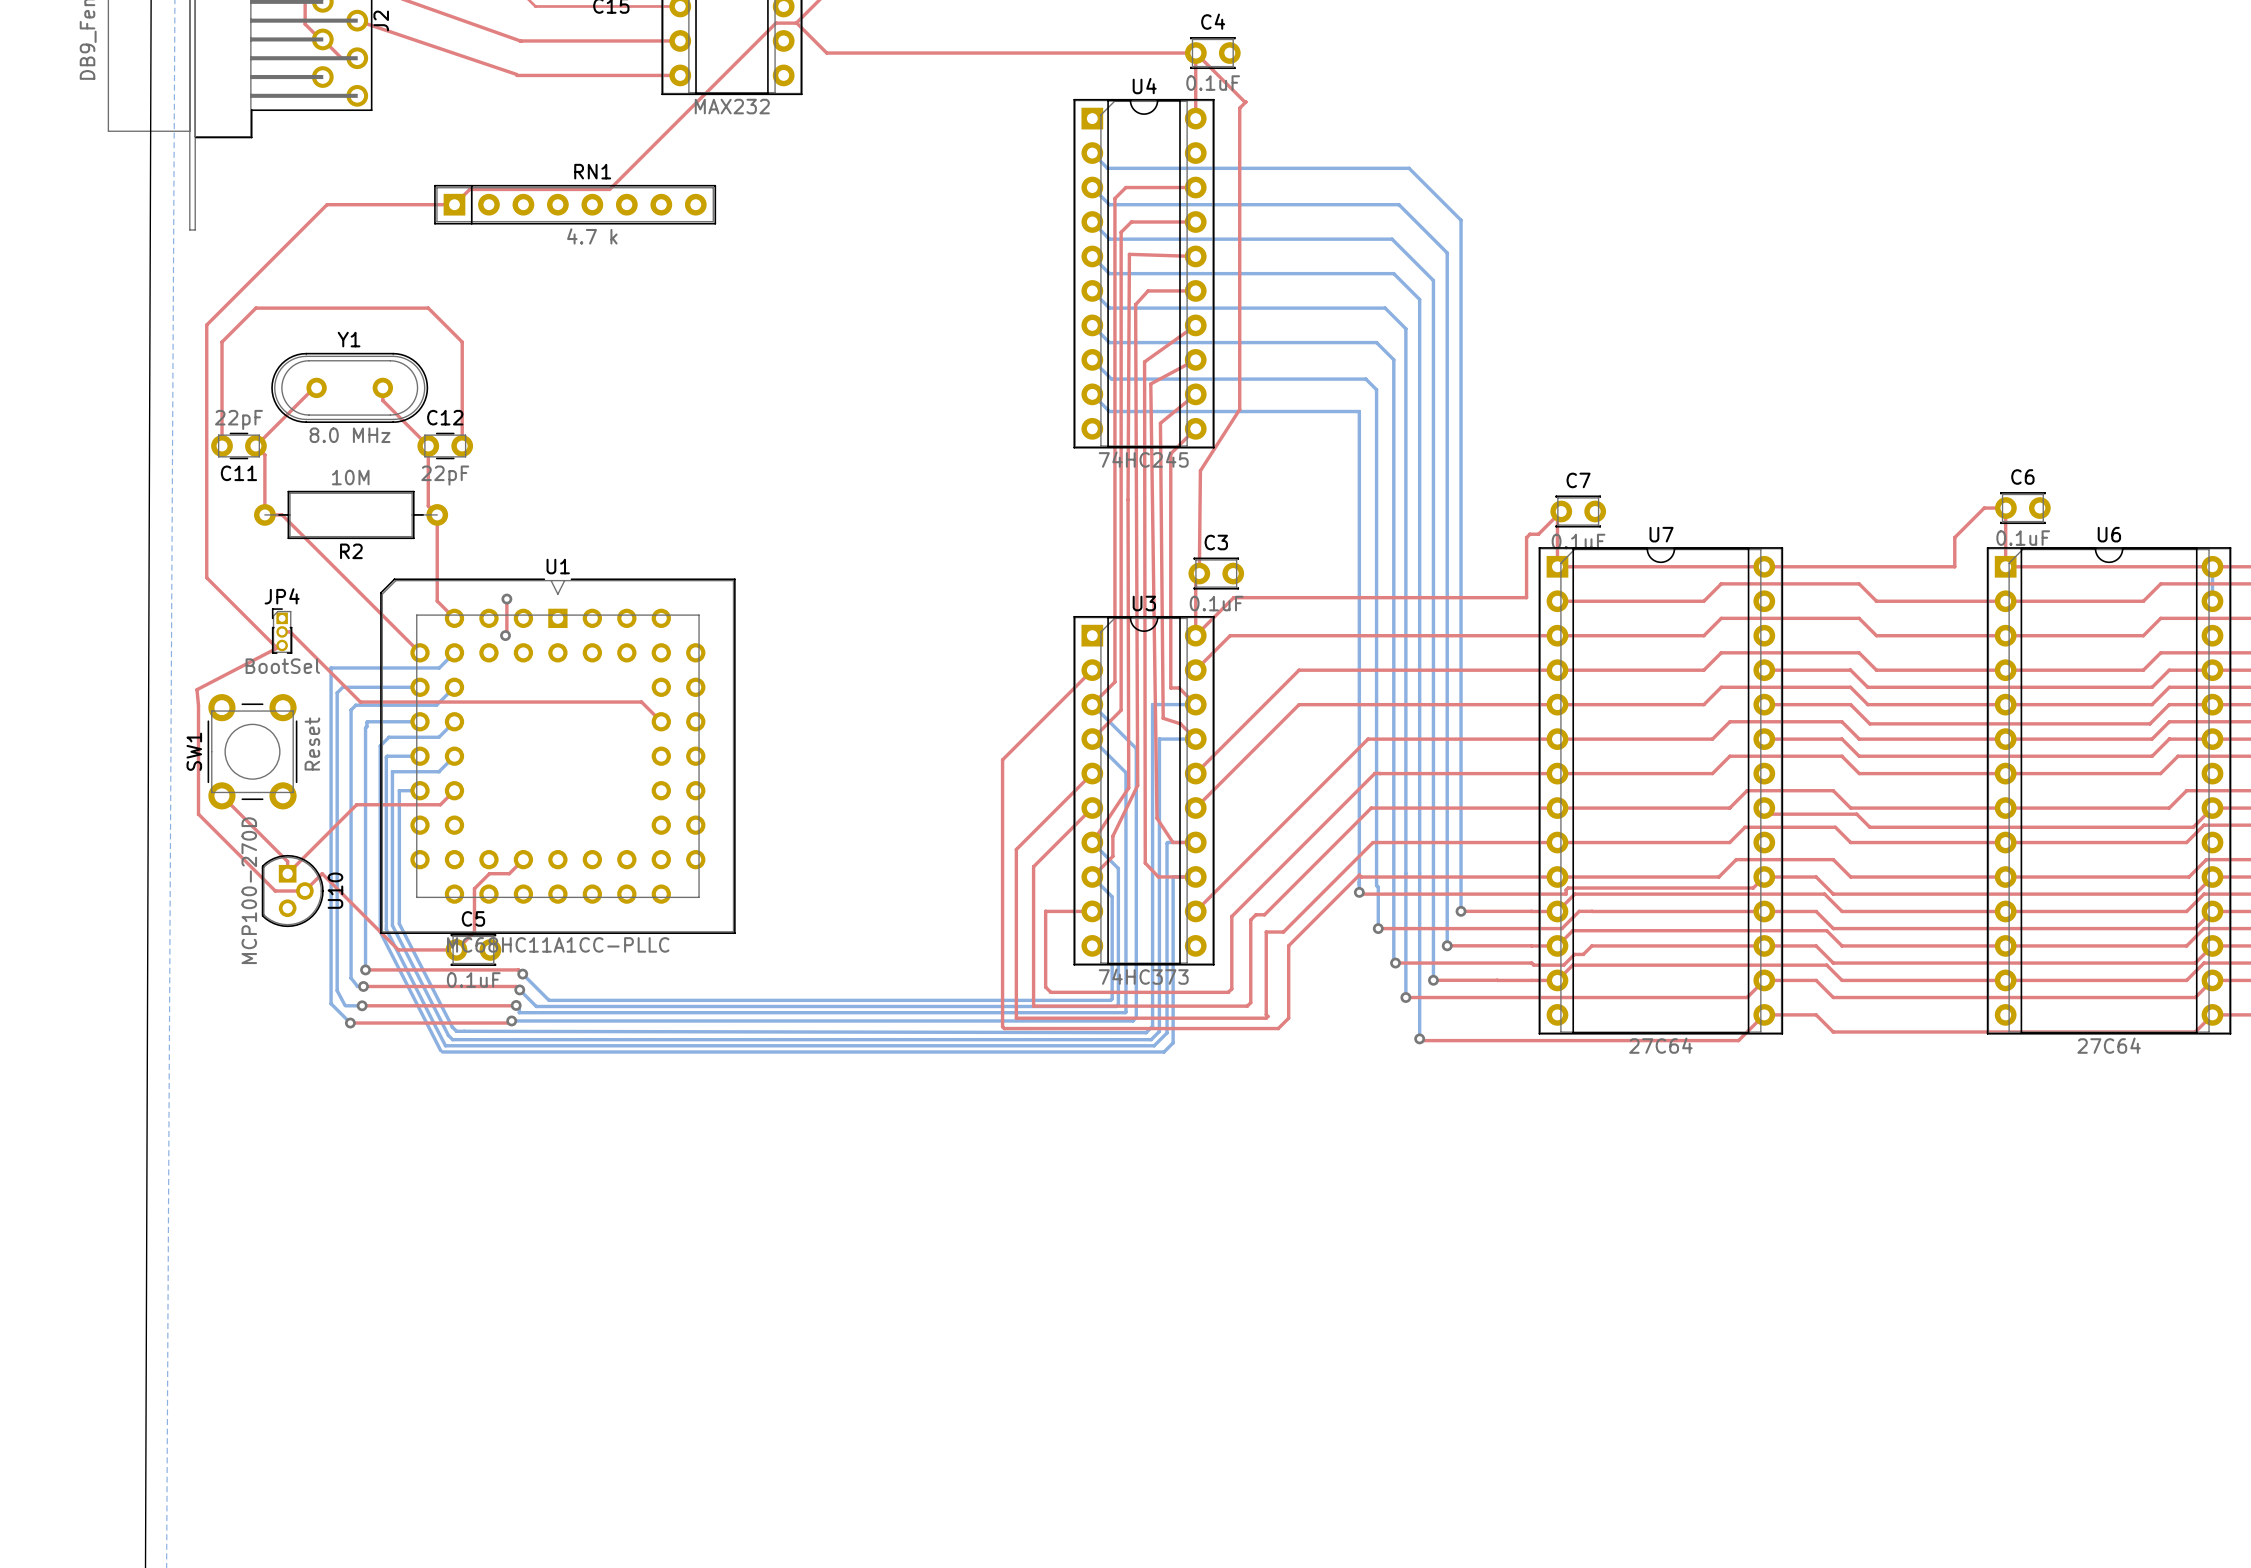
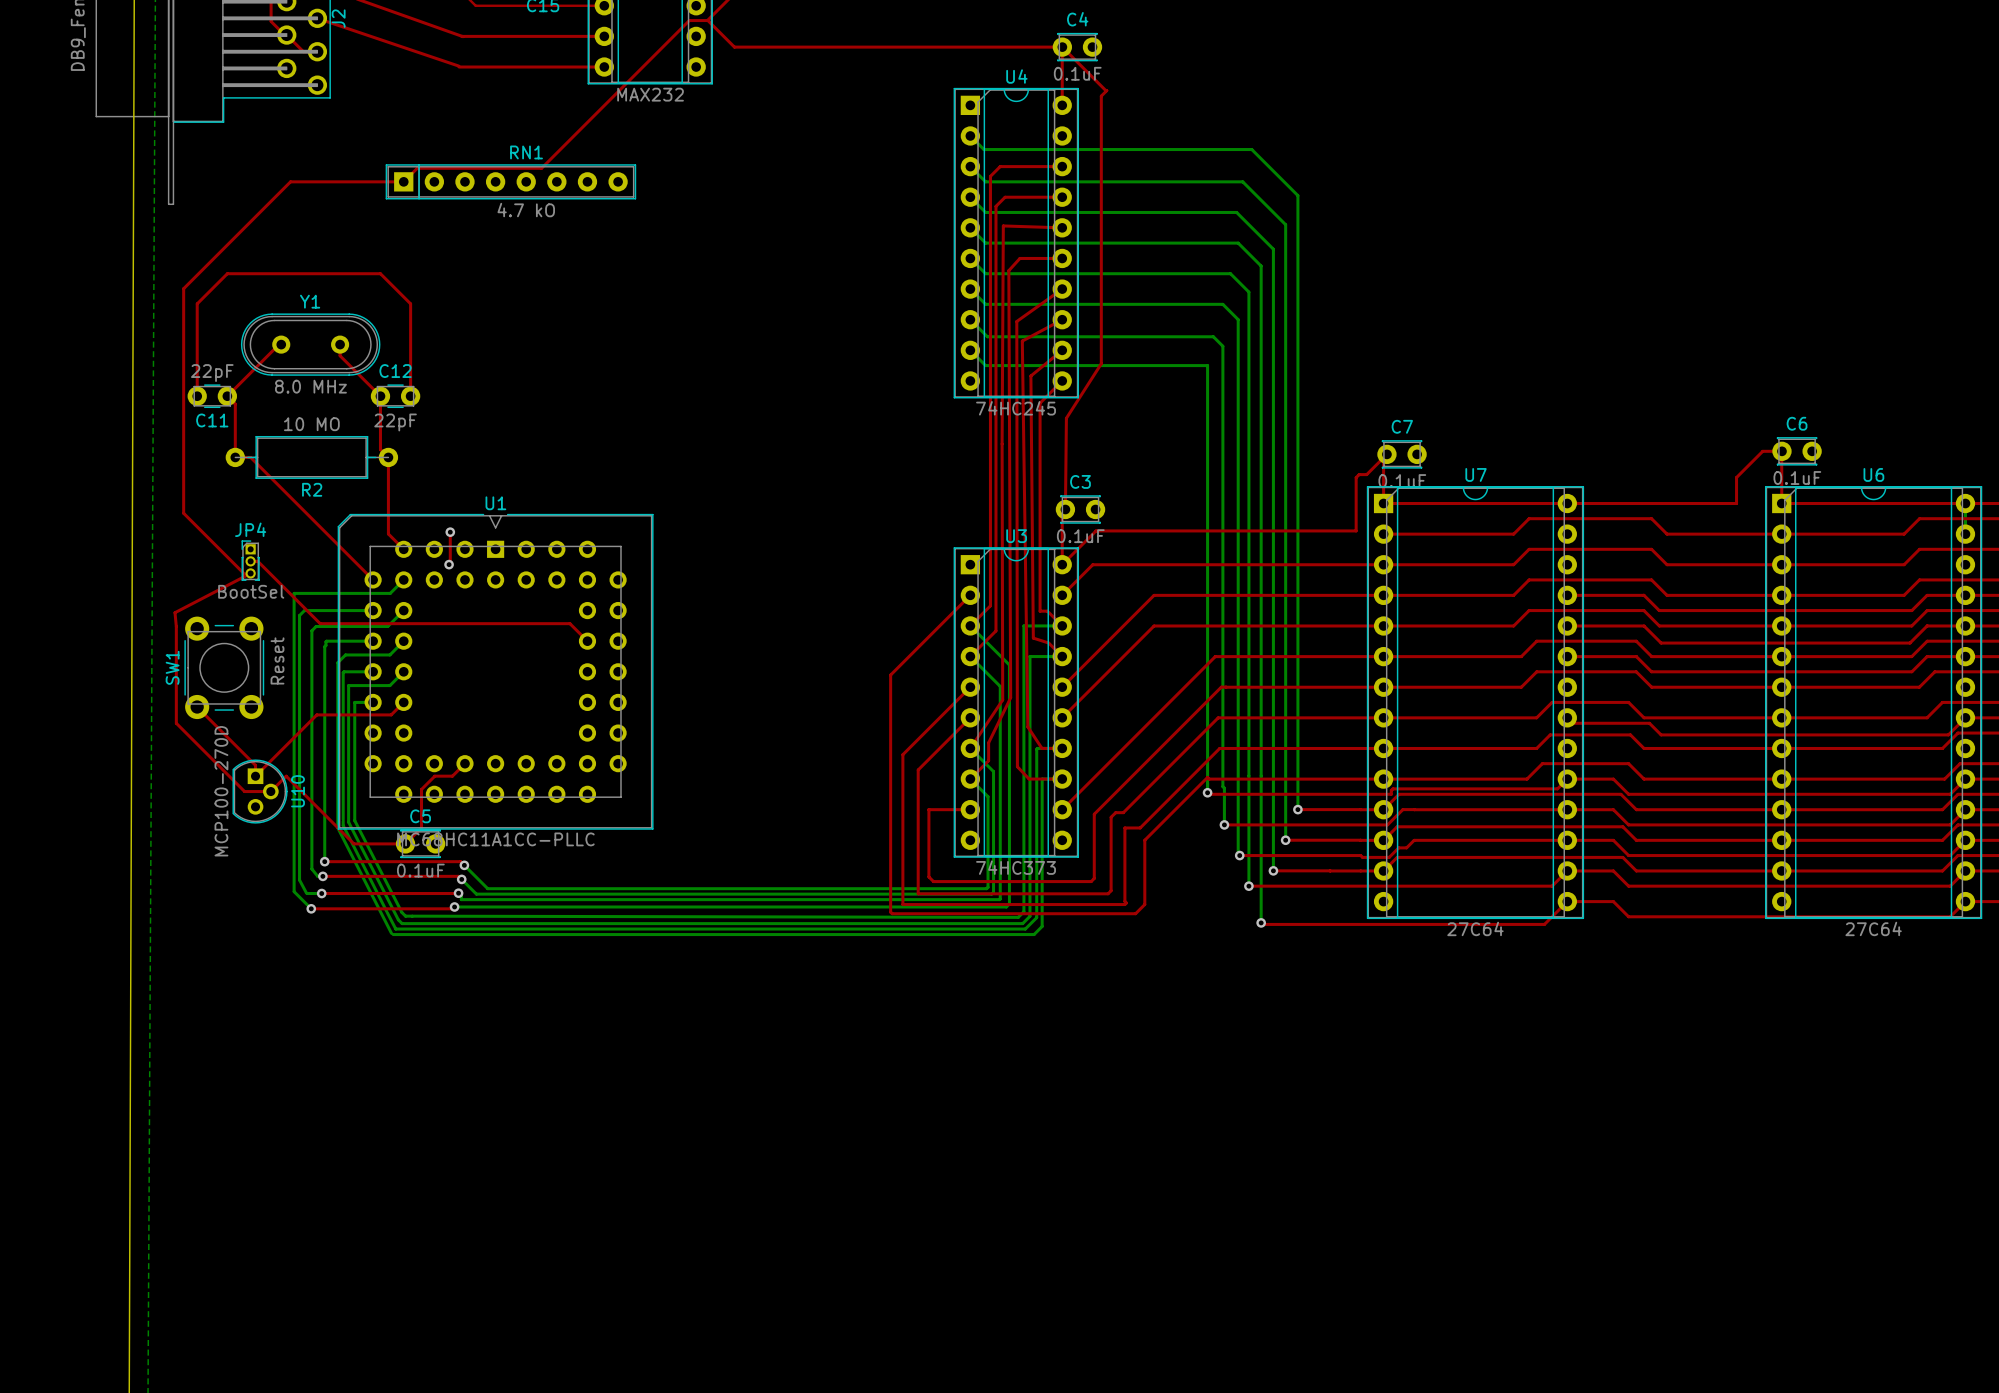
RN1 value: 4.7 k (592, 236) -> 4.7 kO (526, 210)
R2 value: 10M (350, 477) -> 10 MO (311, 424)

